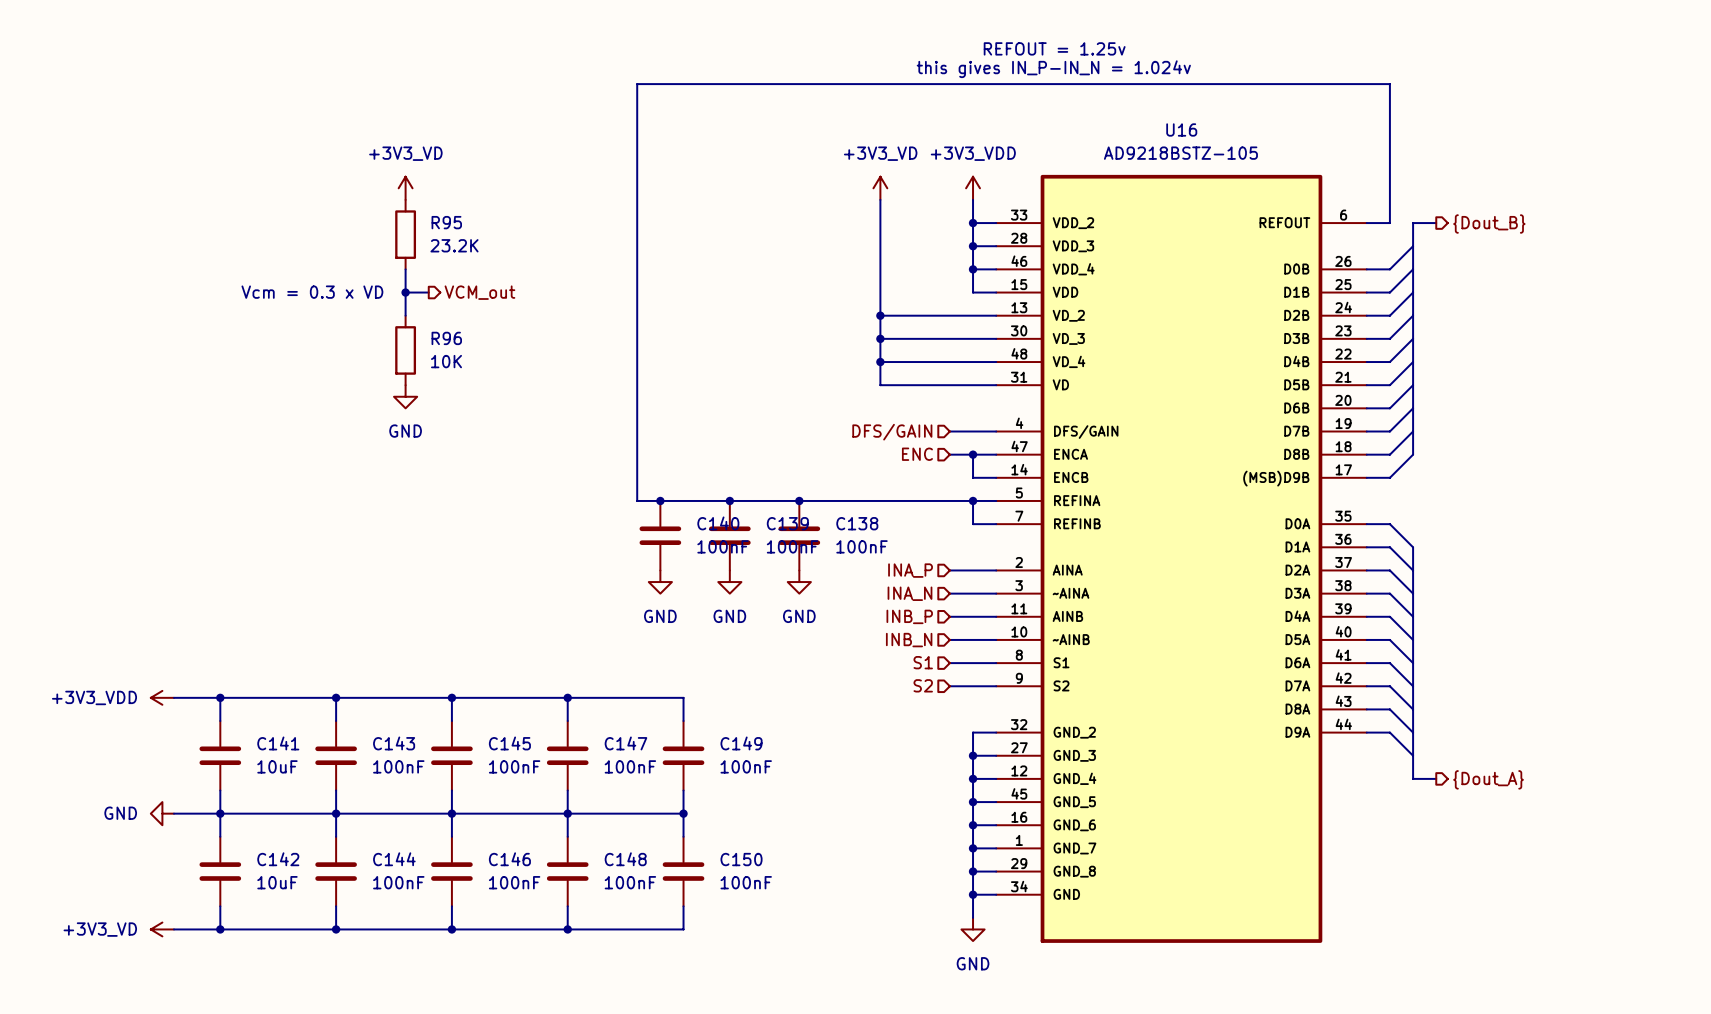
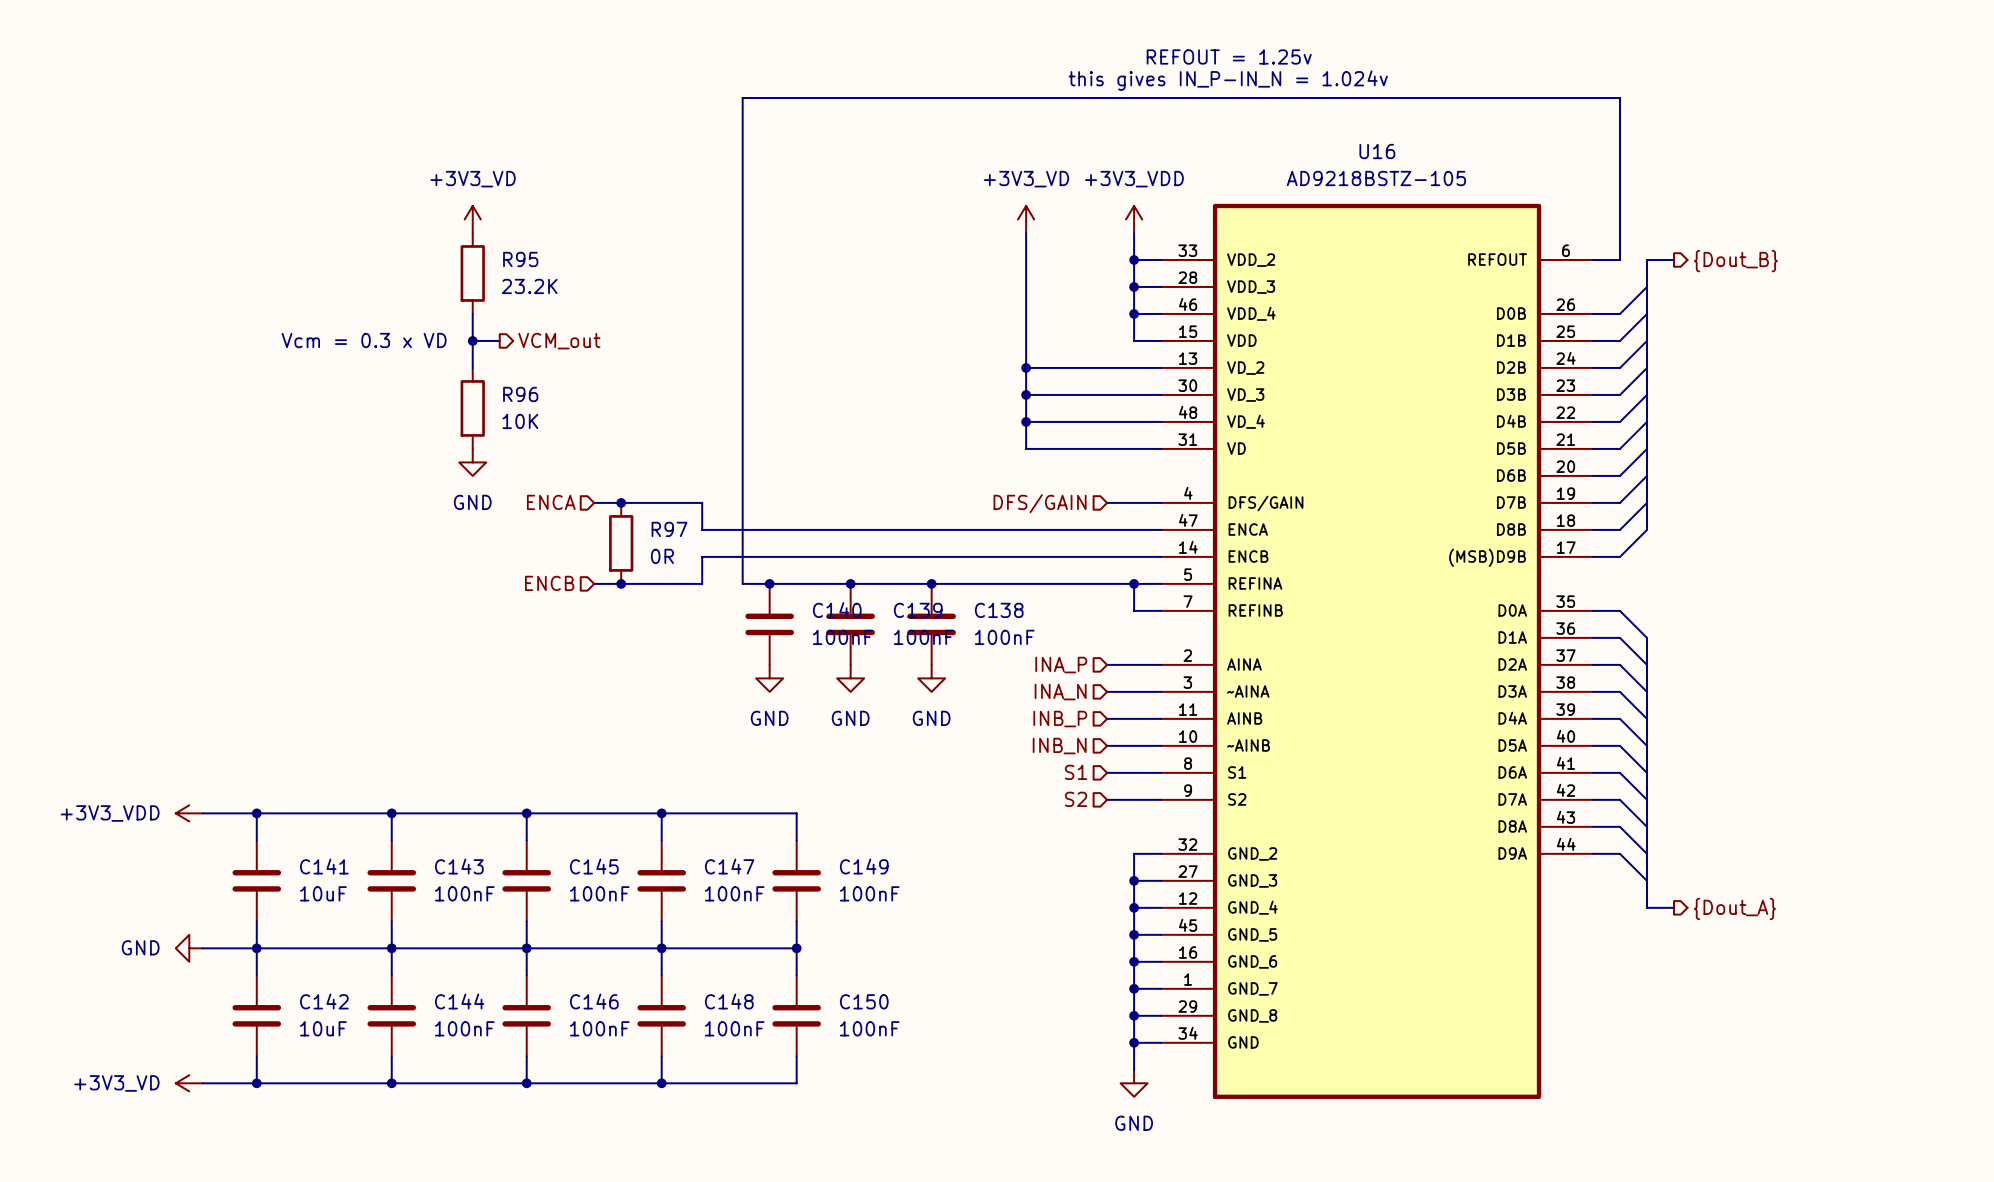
hierarchical label: none -> ENCA (551, 502)
wire: none -> (594, 502) (702, 502) (702, 529) (1107, 529)
junction: none -> (621, 502)
hierarchical label: ENC (917, 454) -> none
wire: (973, 454) (973, 477) -> (594, 583) (702, 583) (702, 556) (1134, 556)
junction: (973, 454) -> none
R97: none -> 0R (621, 543)
hierarchical label: none -> ENCB (549, 583)
junction: none -> (621, 583)

